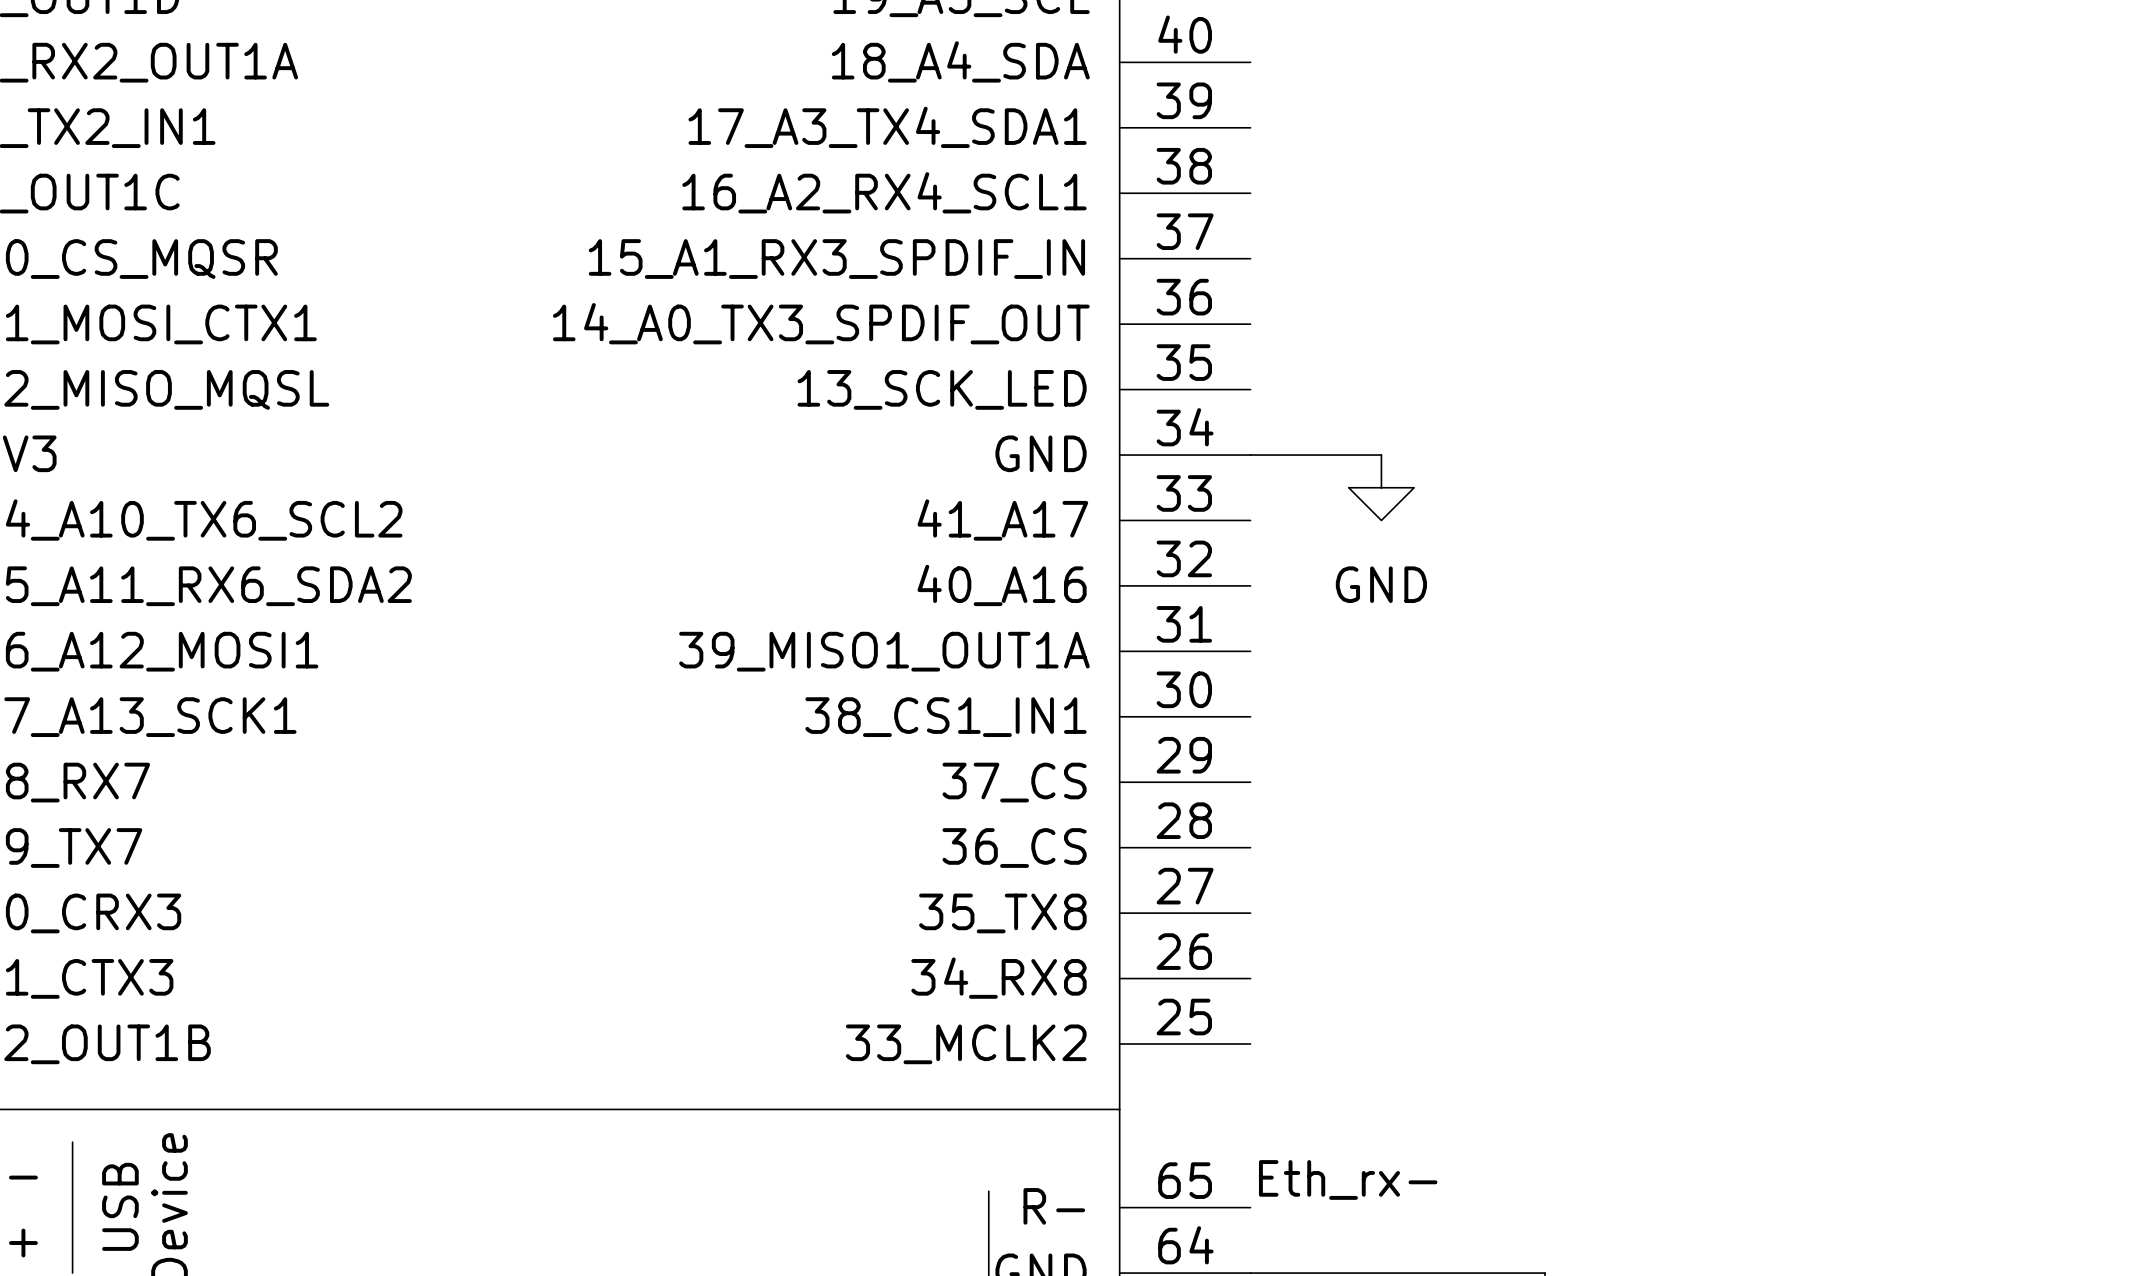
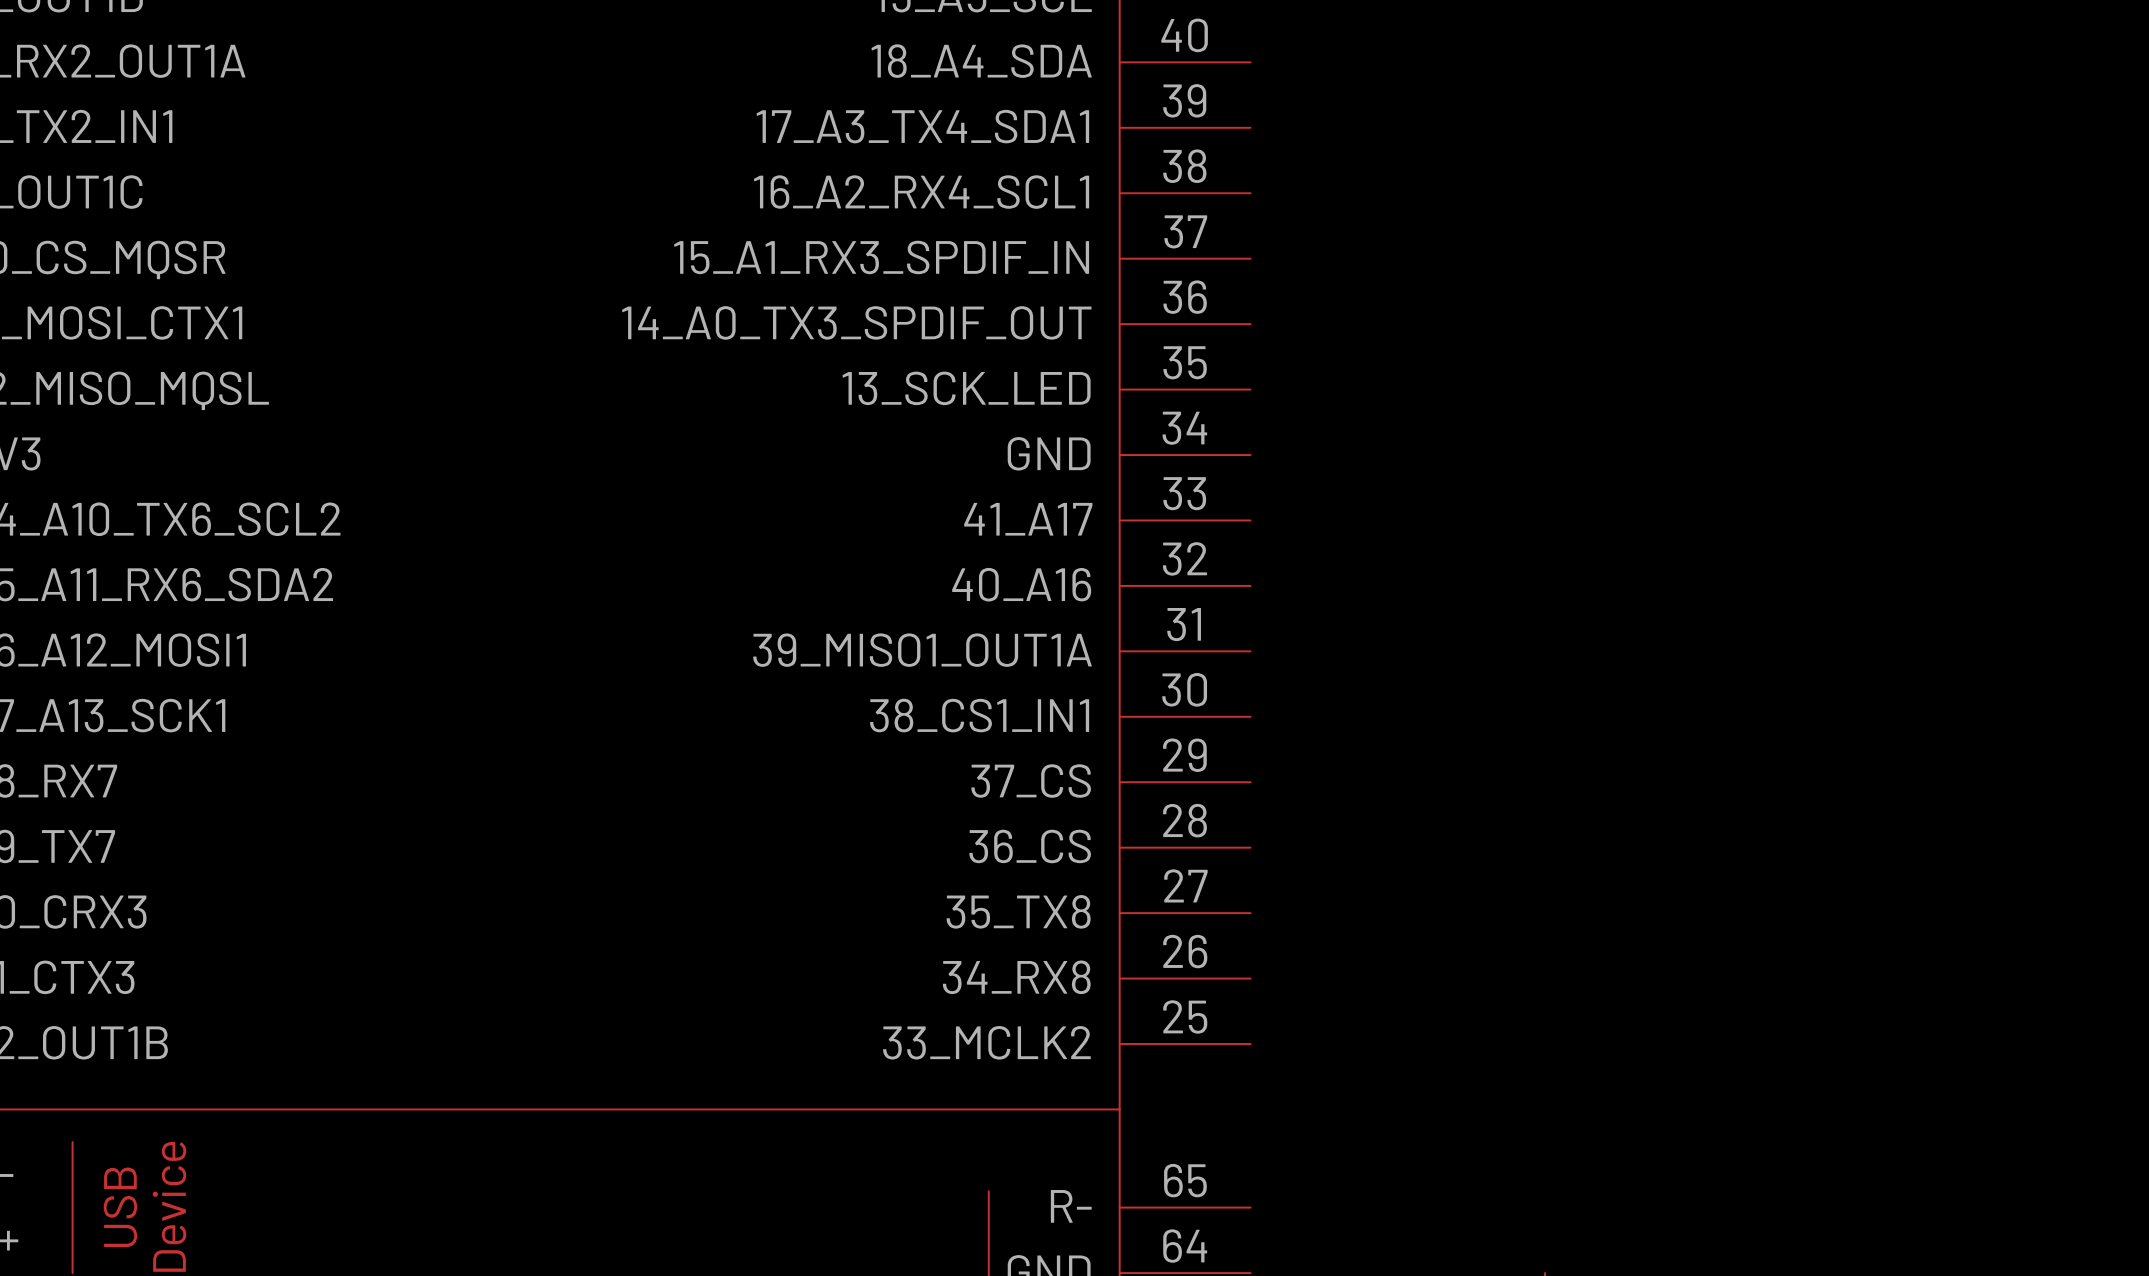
wire: (1250, 455) (1381, 455) -> none
power symbol: GND (1381, 487) -> none
label: Eth_rx- (1348, 1179) -> none
wire: (1250, 1273) (1545, 1273) -> none

